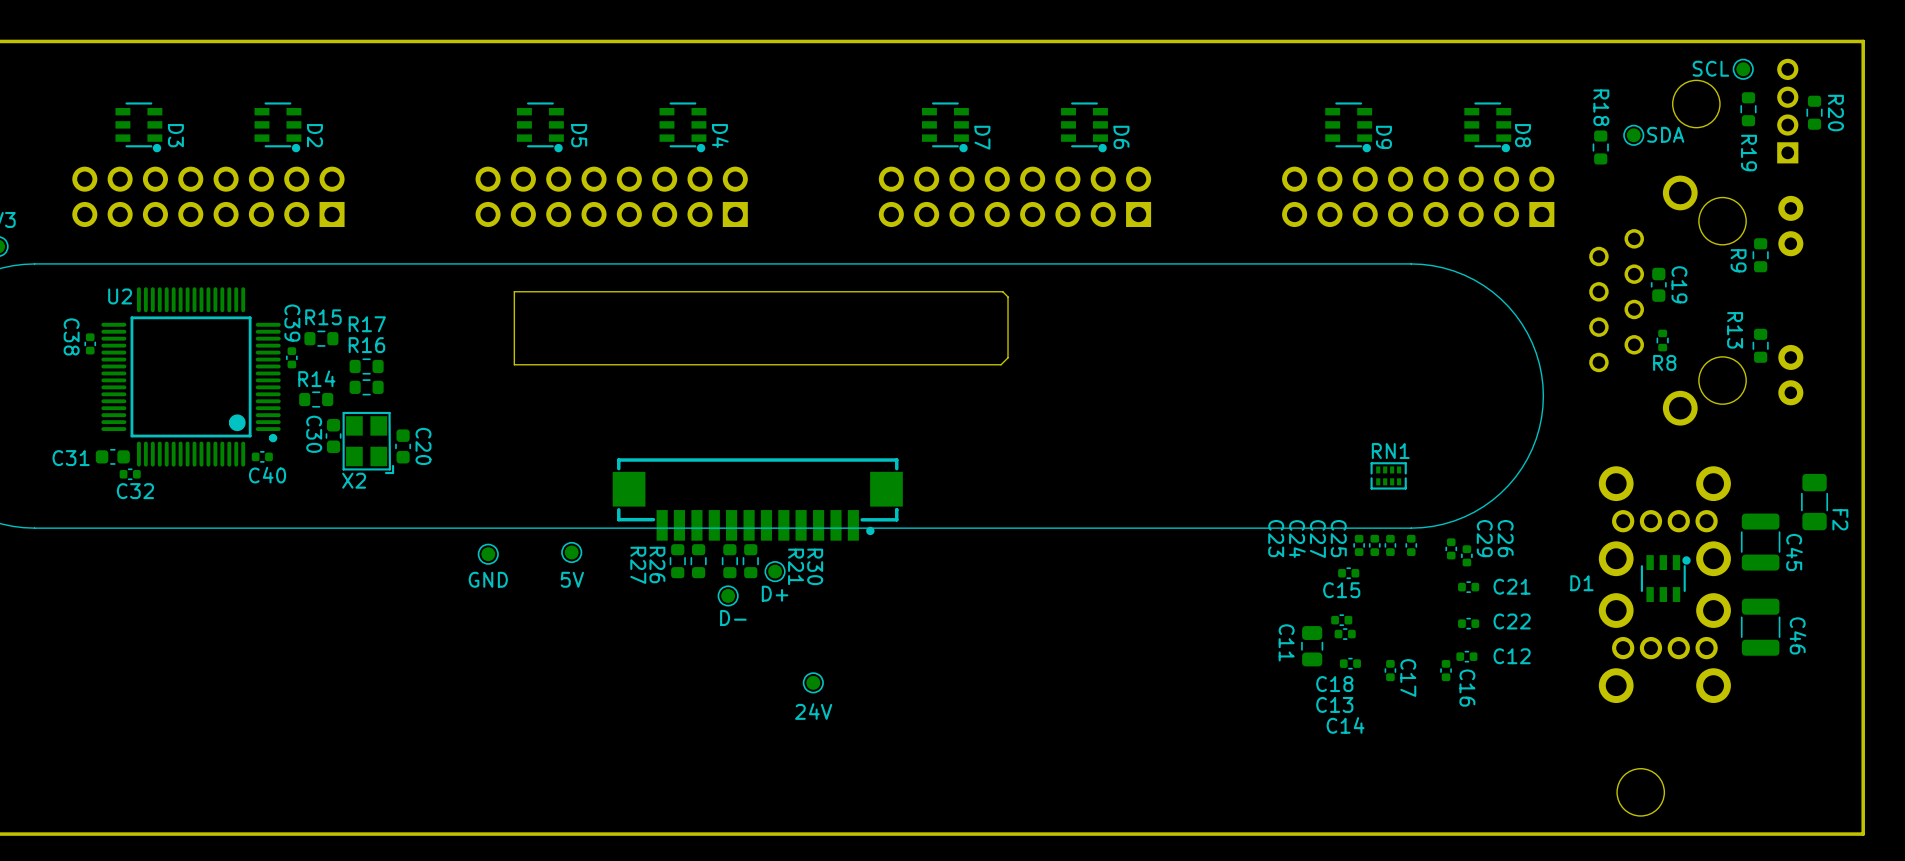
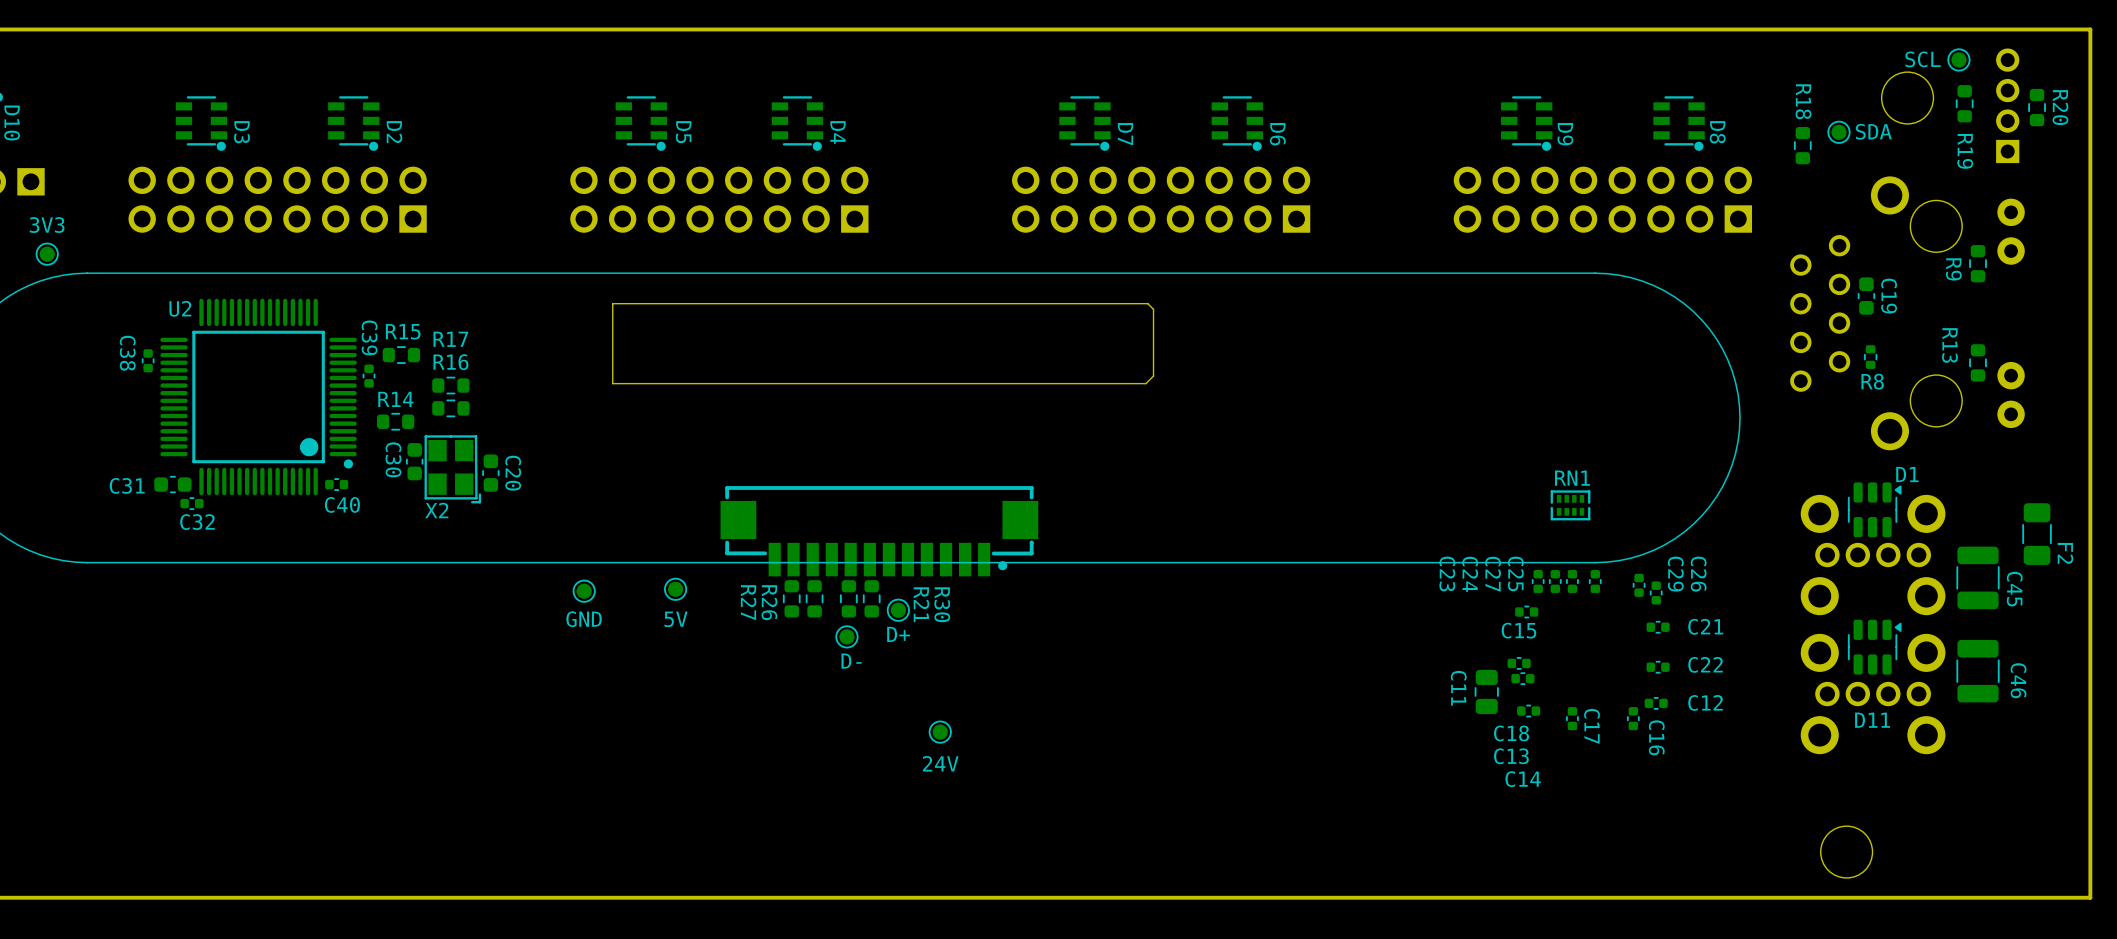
D1 footprint: [1640, 555, 1691, 602] -> [1847, 482, 1902, 538]
D1 name position: D1 (1581, 583) -> D1 (1907, 474)
D11: none -> (1874, 647)

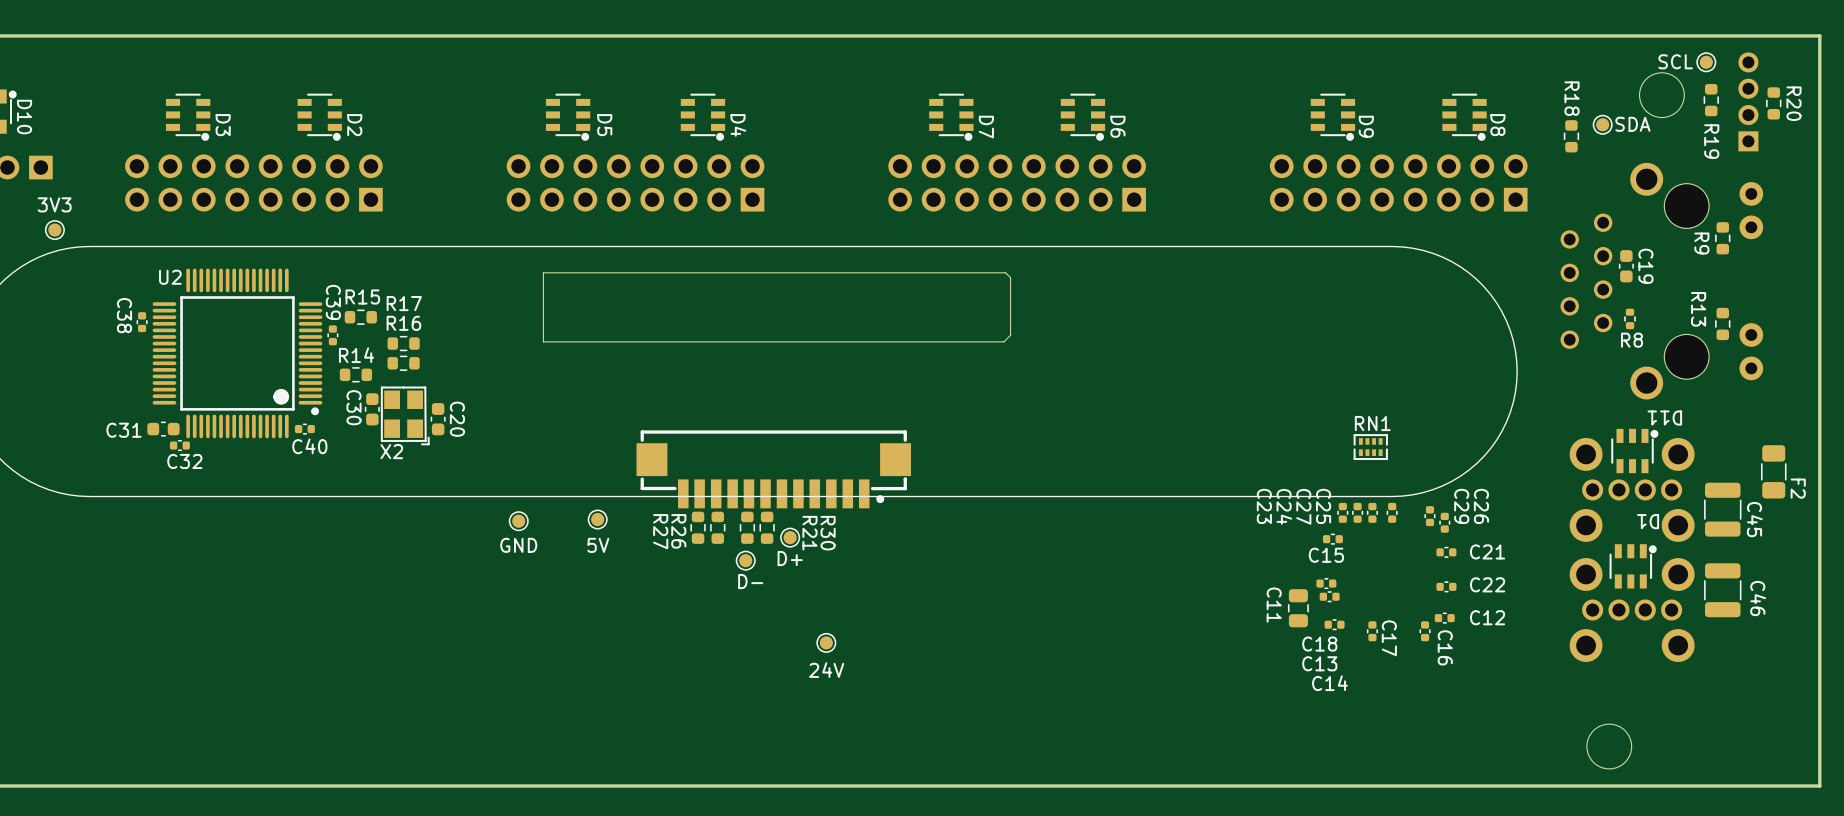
D1 footprint: [1847, 482, 1902, 538] -> [1609, 544, 1657, 589]
D11 footprint: [1847, 619, 1902, 675] -> [1611, 428, 1659, 474]
D11 name position: D11 (1872, 720) -> D11 (1664, 418)

